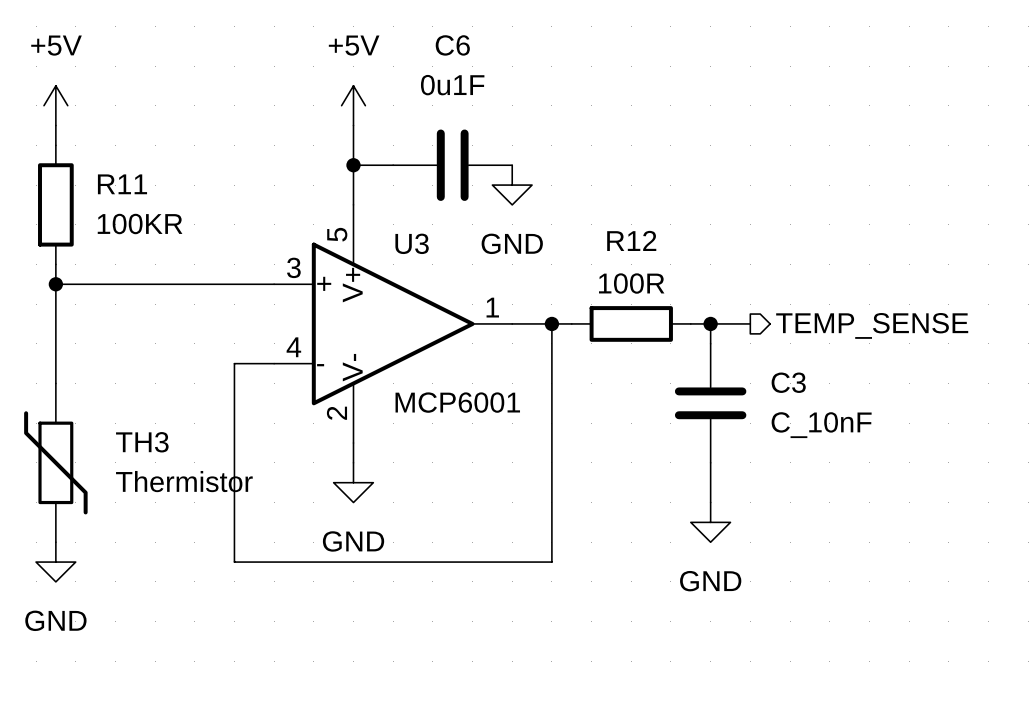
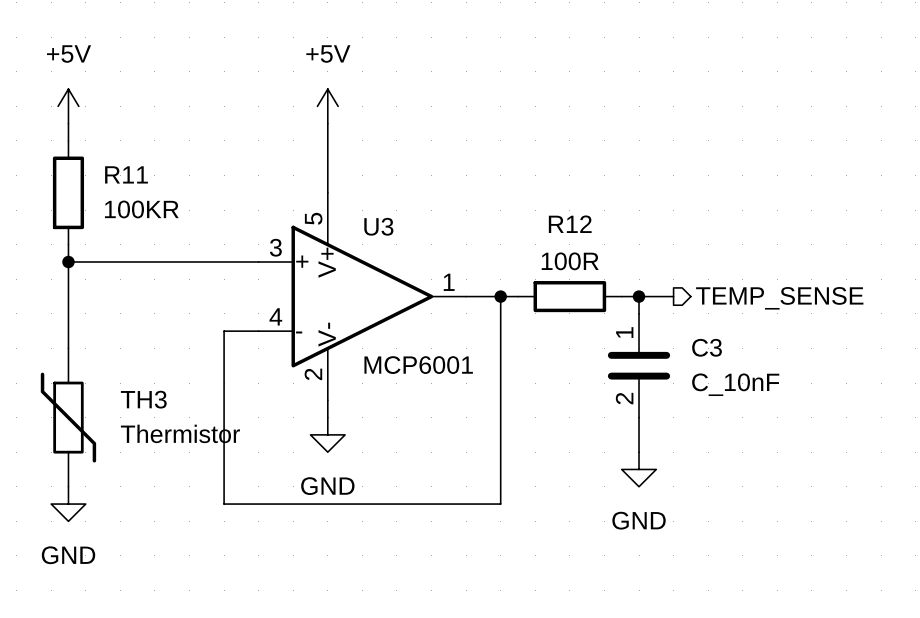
wire: (353, 165) (393, 165) -> none
junction: (353, 165) -> none
C6: 0u1F (452, 165) -> none
power symbol: GND (512, 185) -> none
C3 pin number: none -> 1 (624, 332)
C3 pin number: none -> 2 (624, 398)

